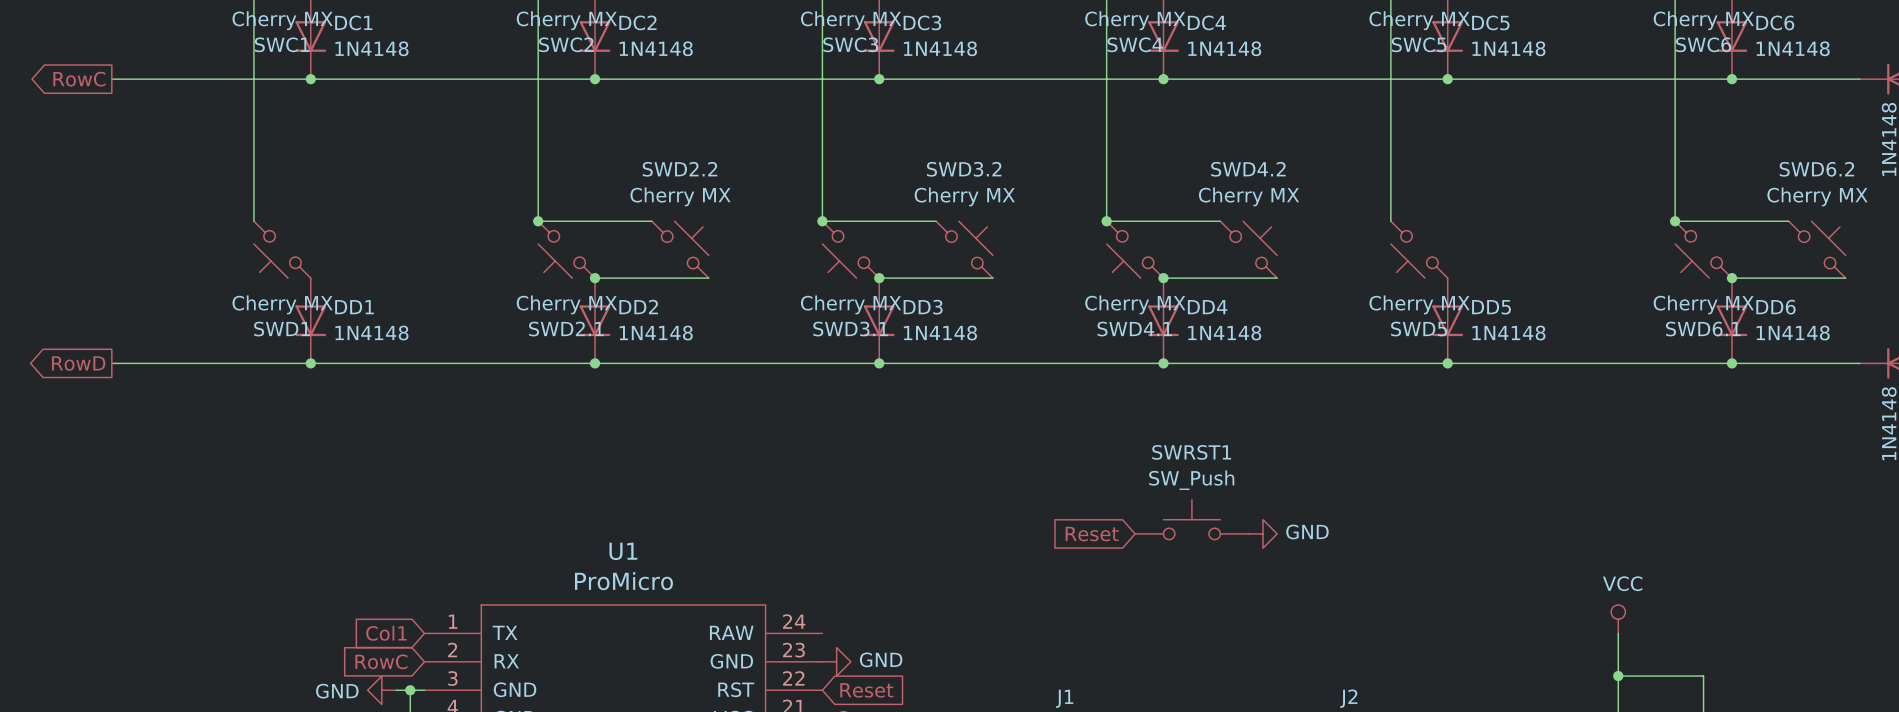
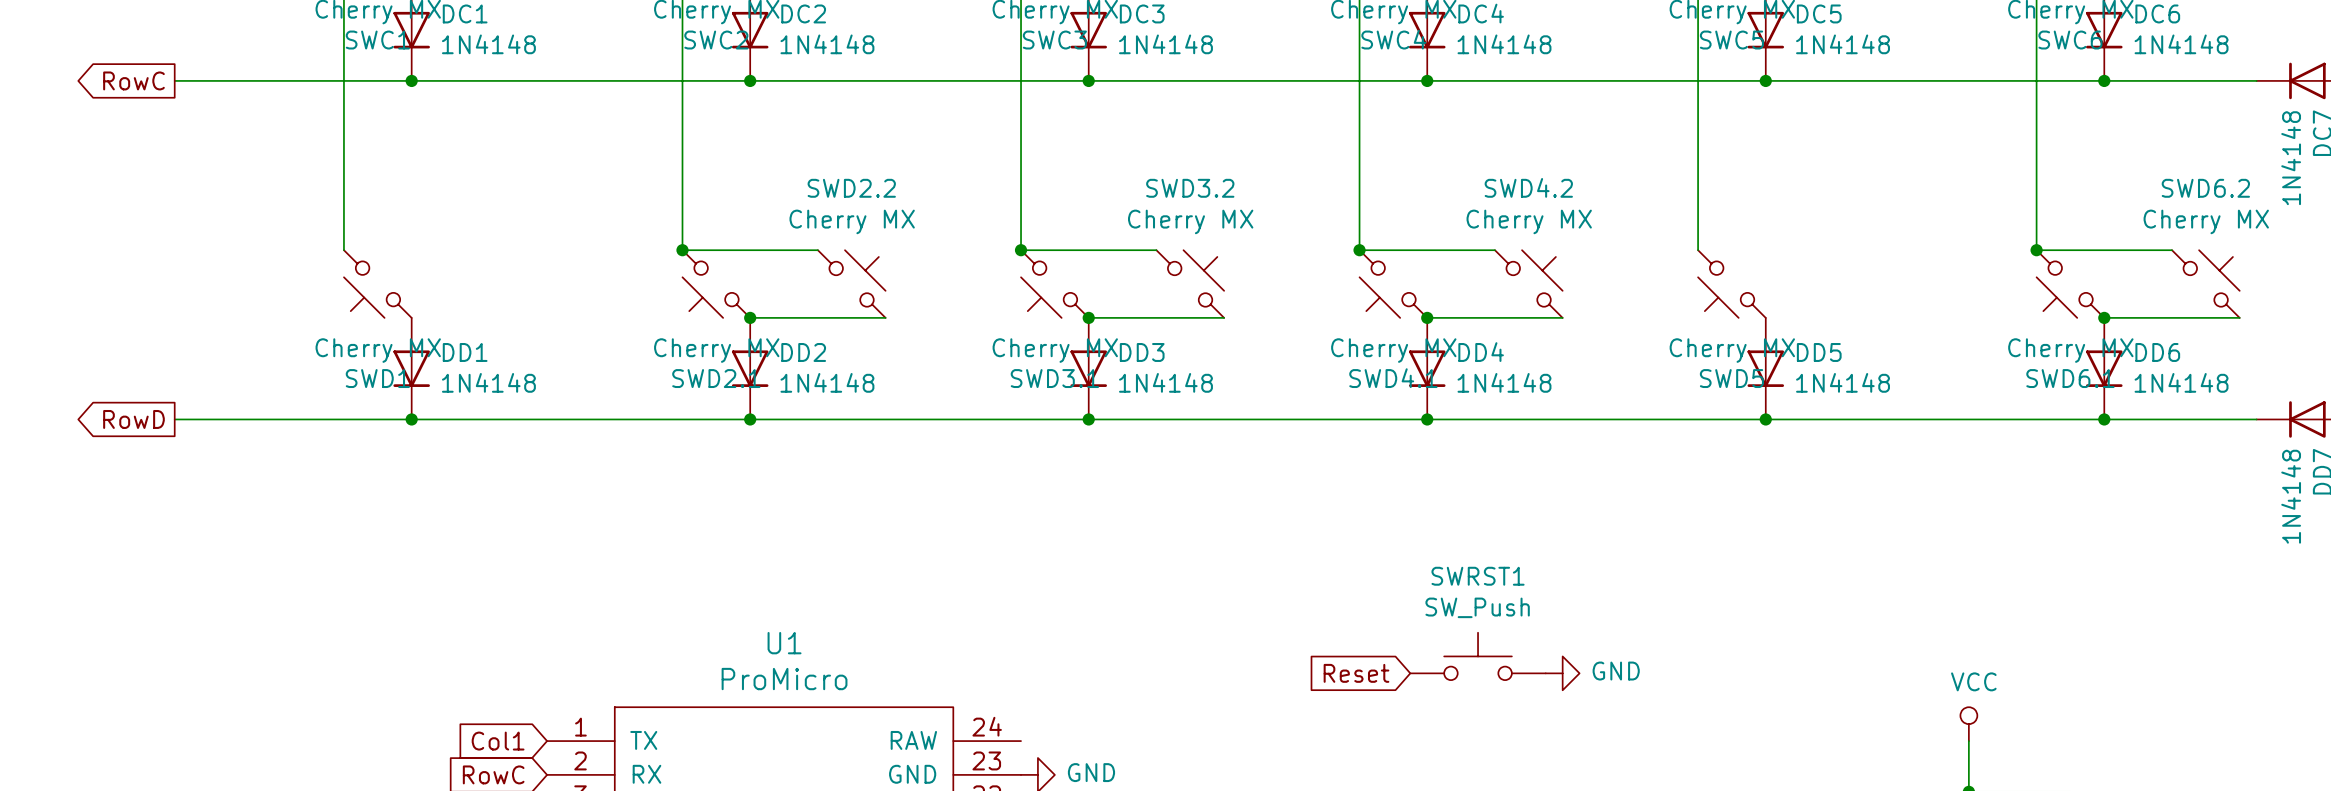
SWRST1 position: (1191, 519) -> (1478, 656)
power symbol position: GND (1262, 533) -> GND (1562, 673)
global label position: Reset (1092, 534) -> Reset (1356, 673)

